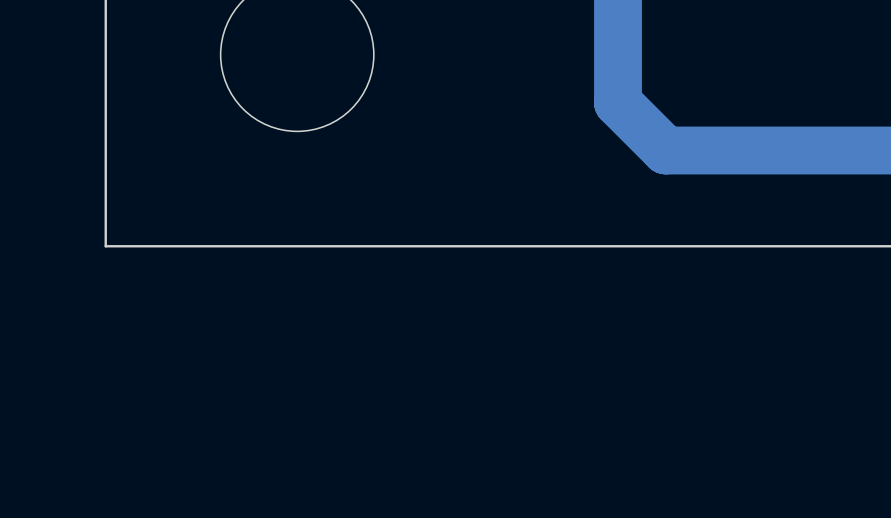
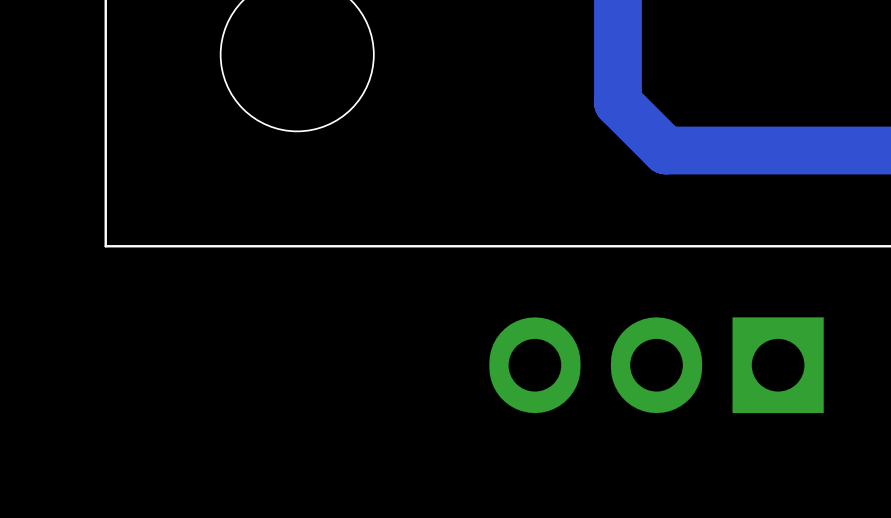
part: none -> (656, 365)

